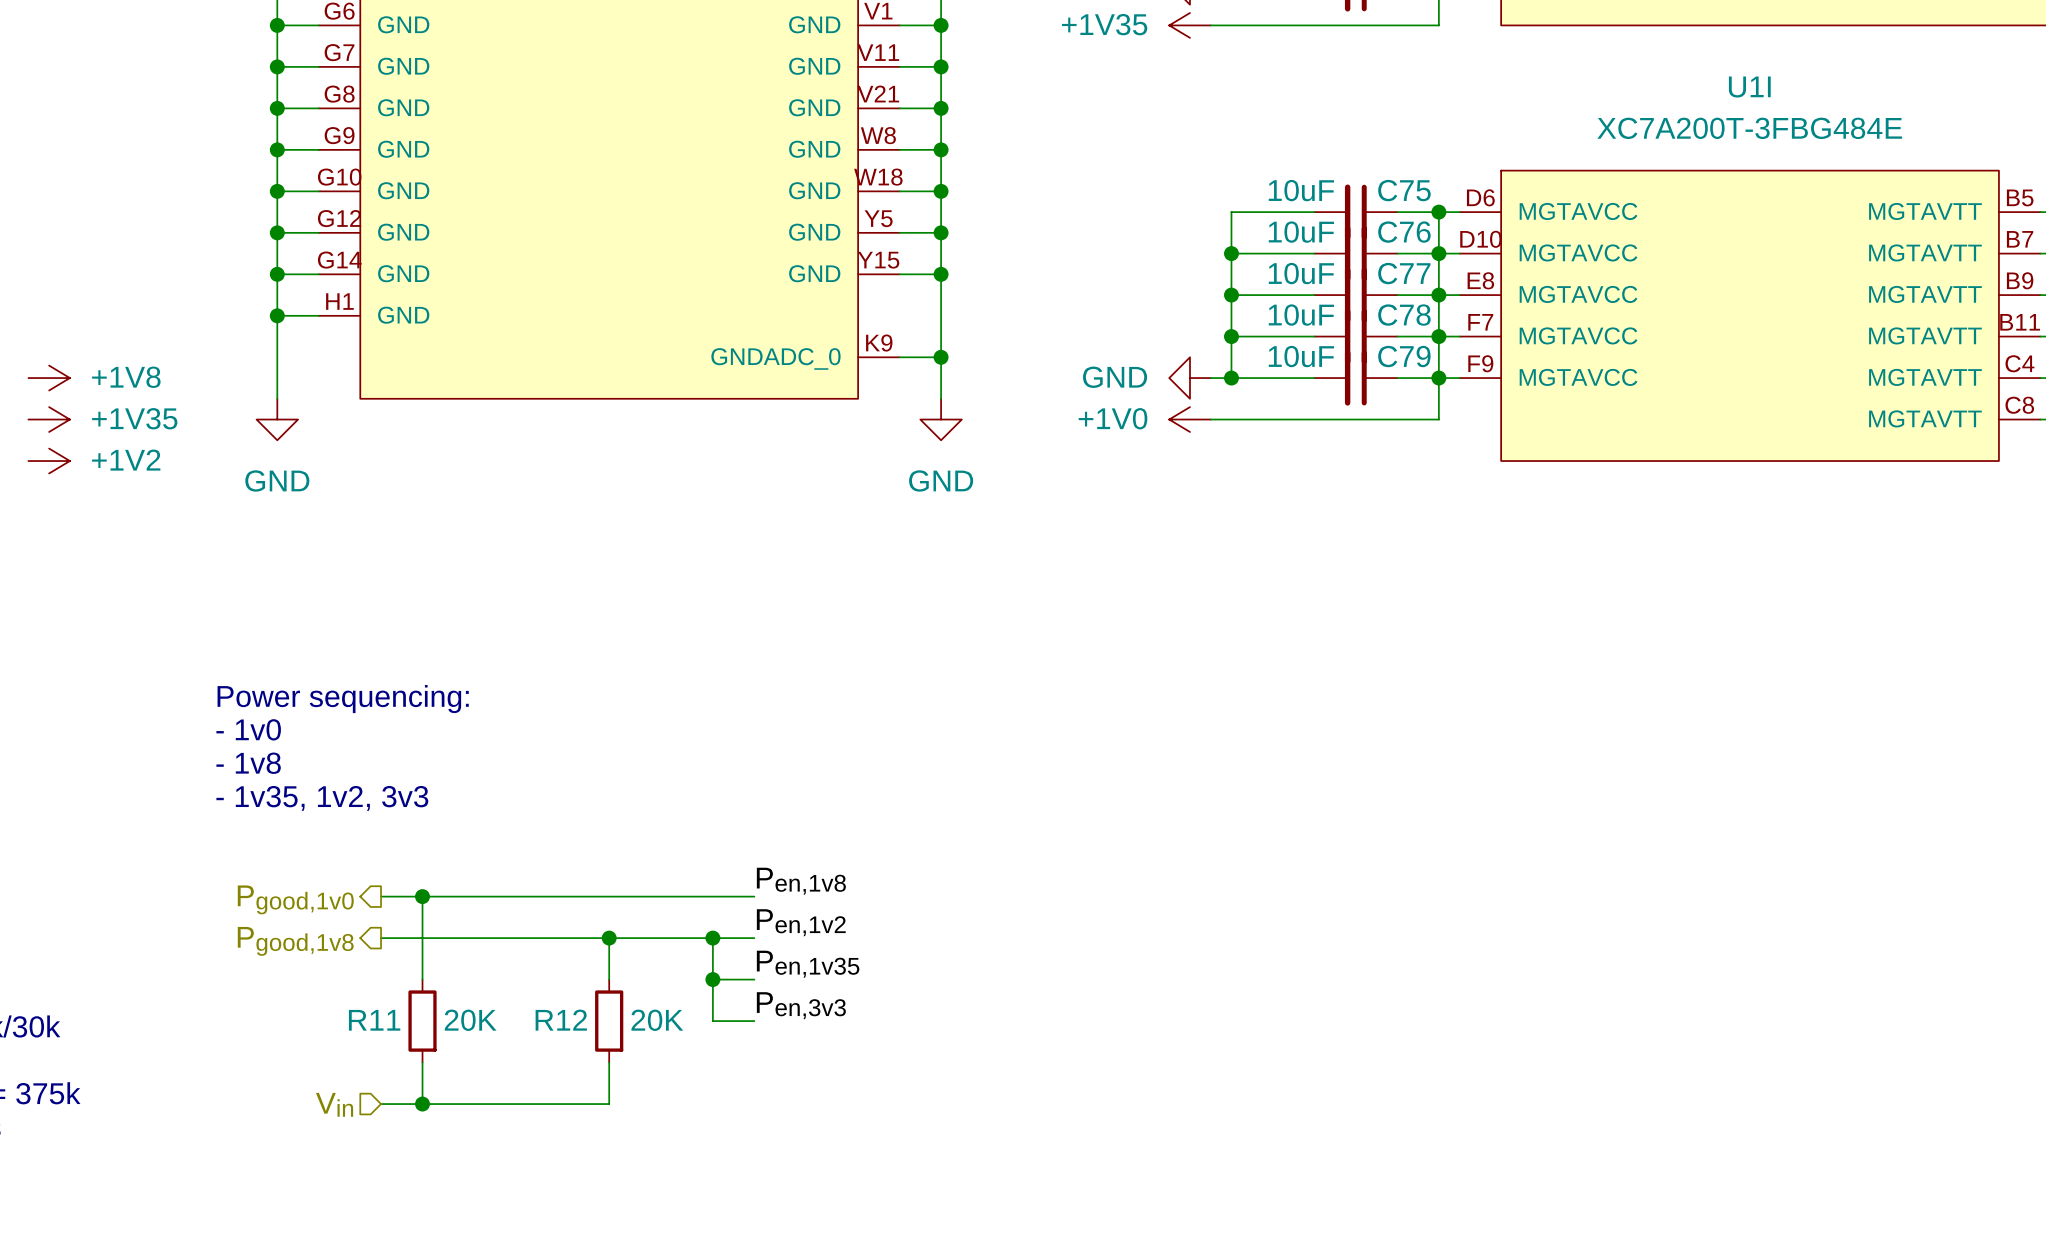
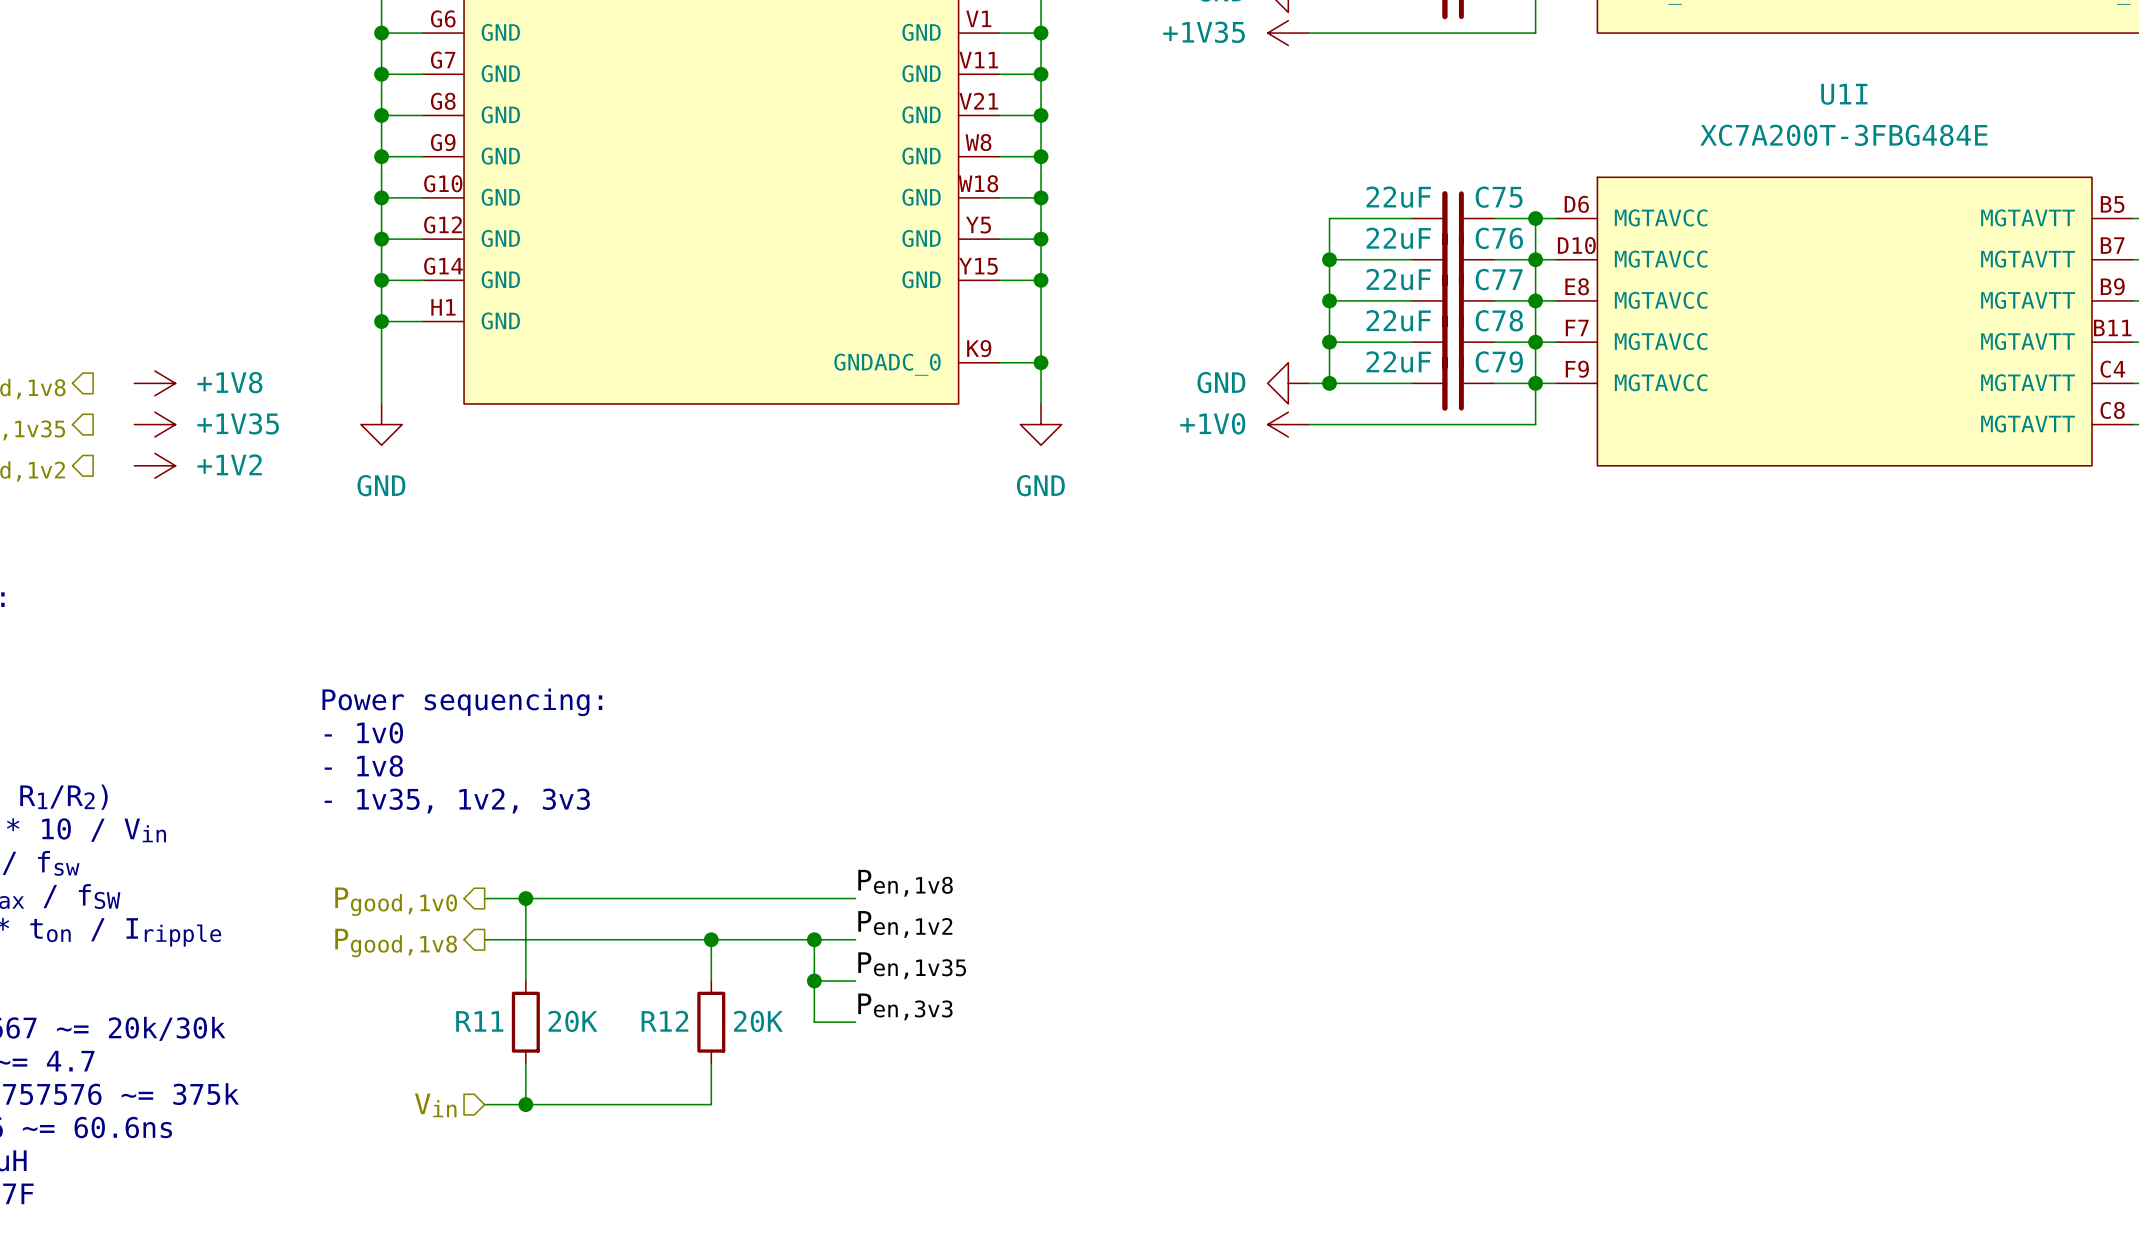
C75 value: 10uF (1301, 190) -> 22uF (1398, 197)
C76 value: 10uF (1301, 232) -> 22uF (1398, 238)
C77 value: 10uF (1301, 273) -> 22uF (1398, 279)
C78 value: 10uF (1301, 315) -> 22uF (1398, 320)
C79 value: 10uF (1301, 356) -> 22uF (1398, 362)

